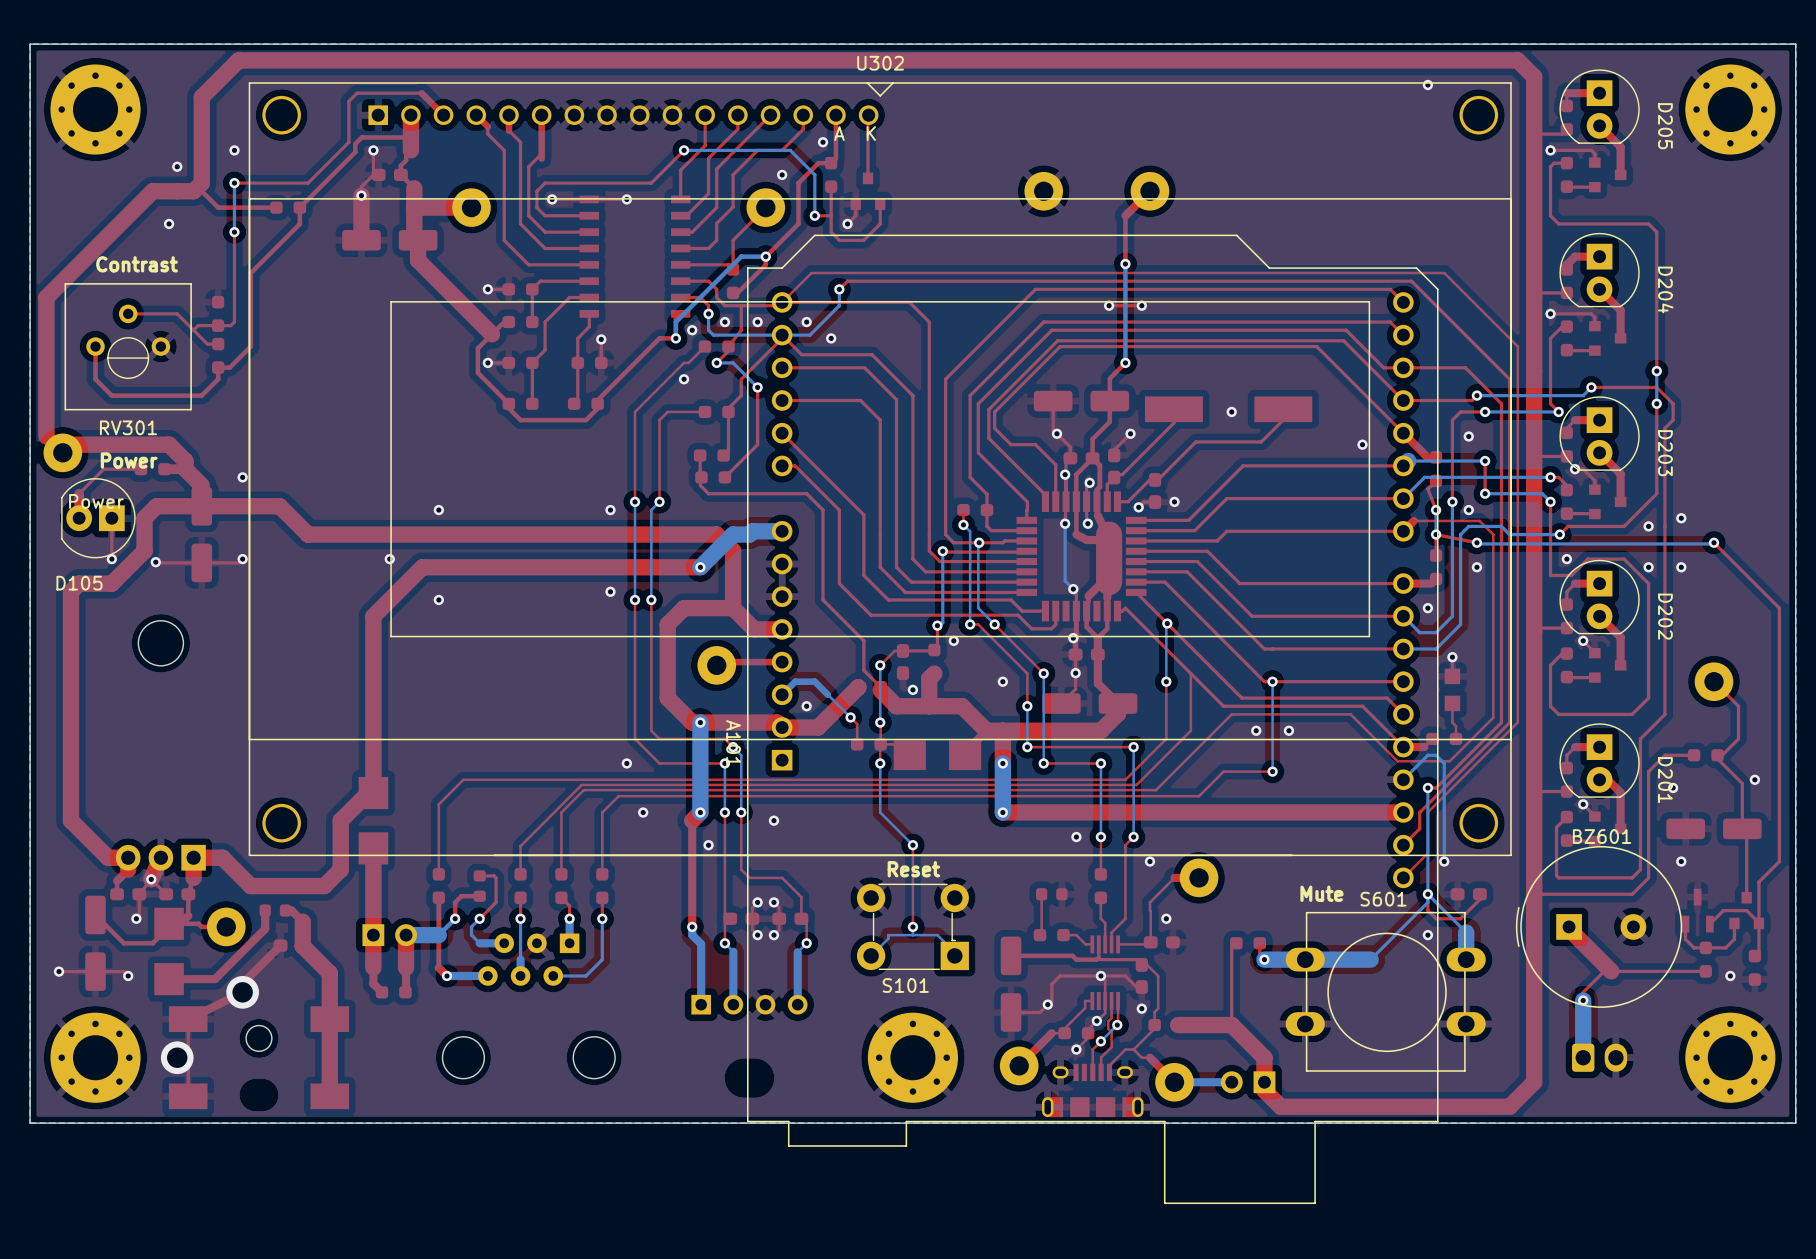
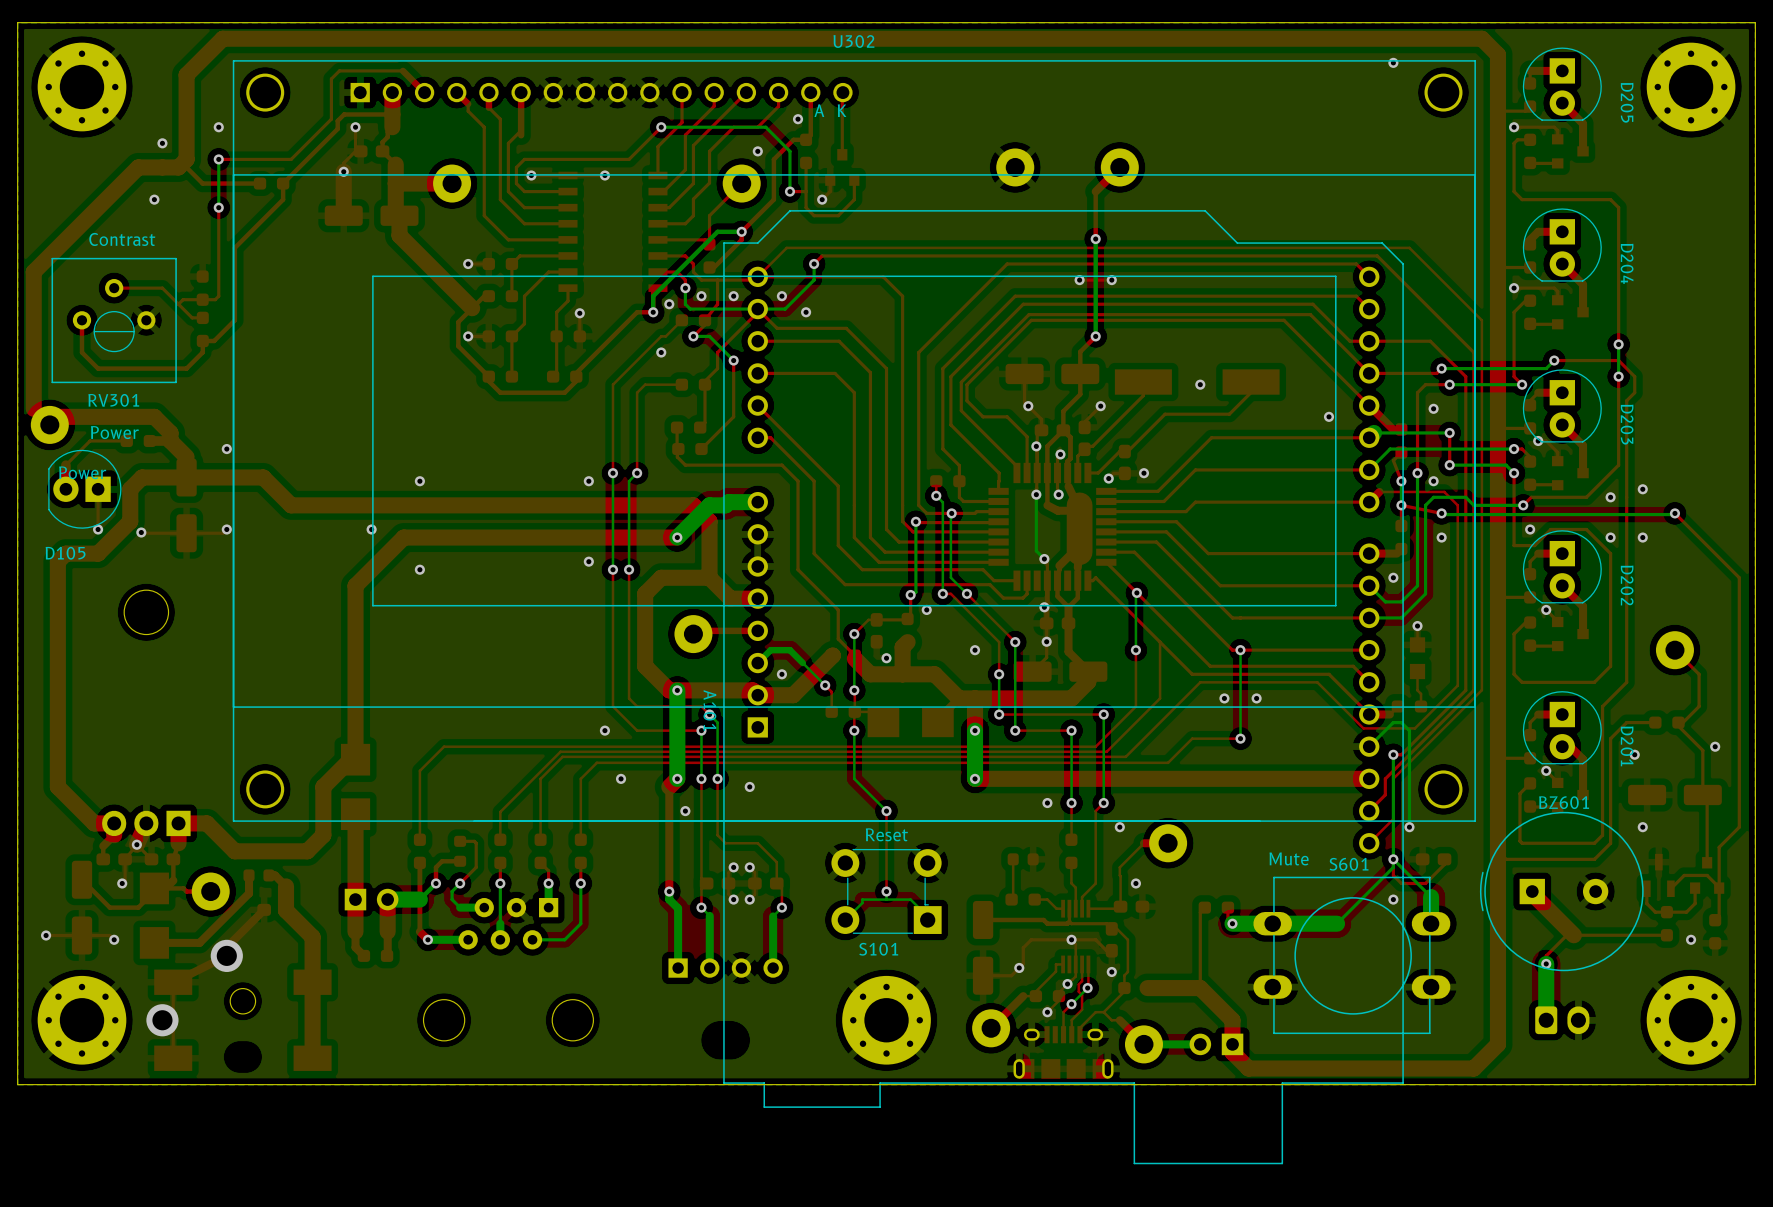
U302 footprint: [248, 82, 1512, 857] -> [232, 60, 1476, 822]

